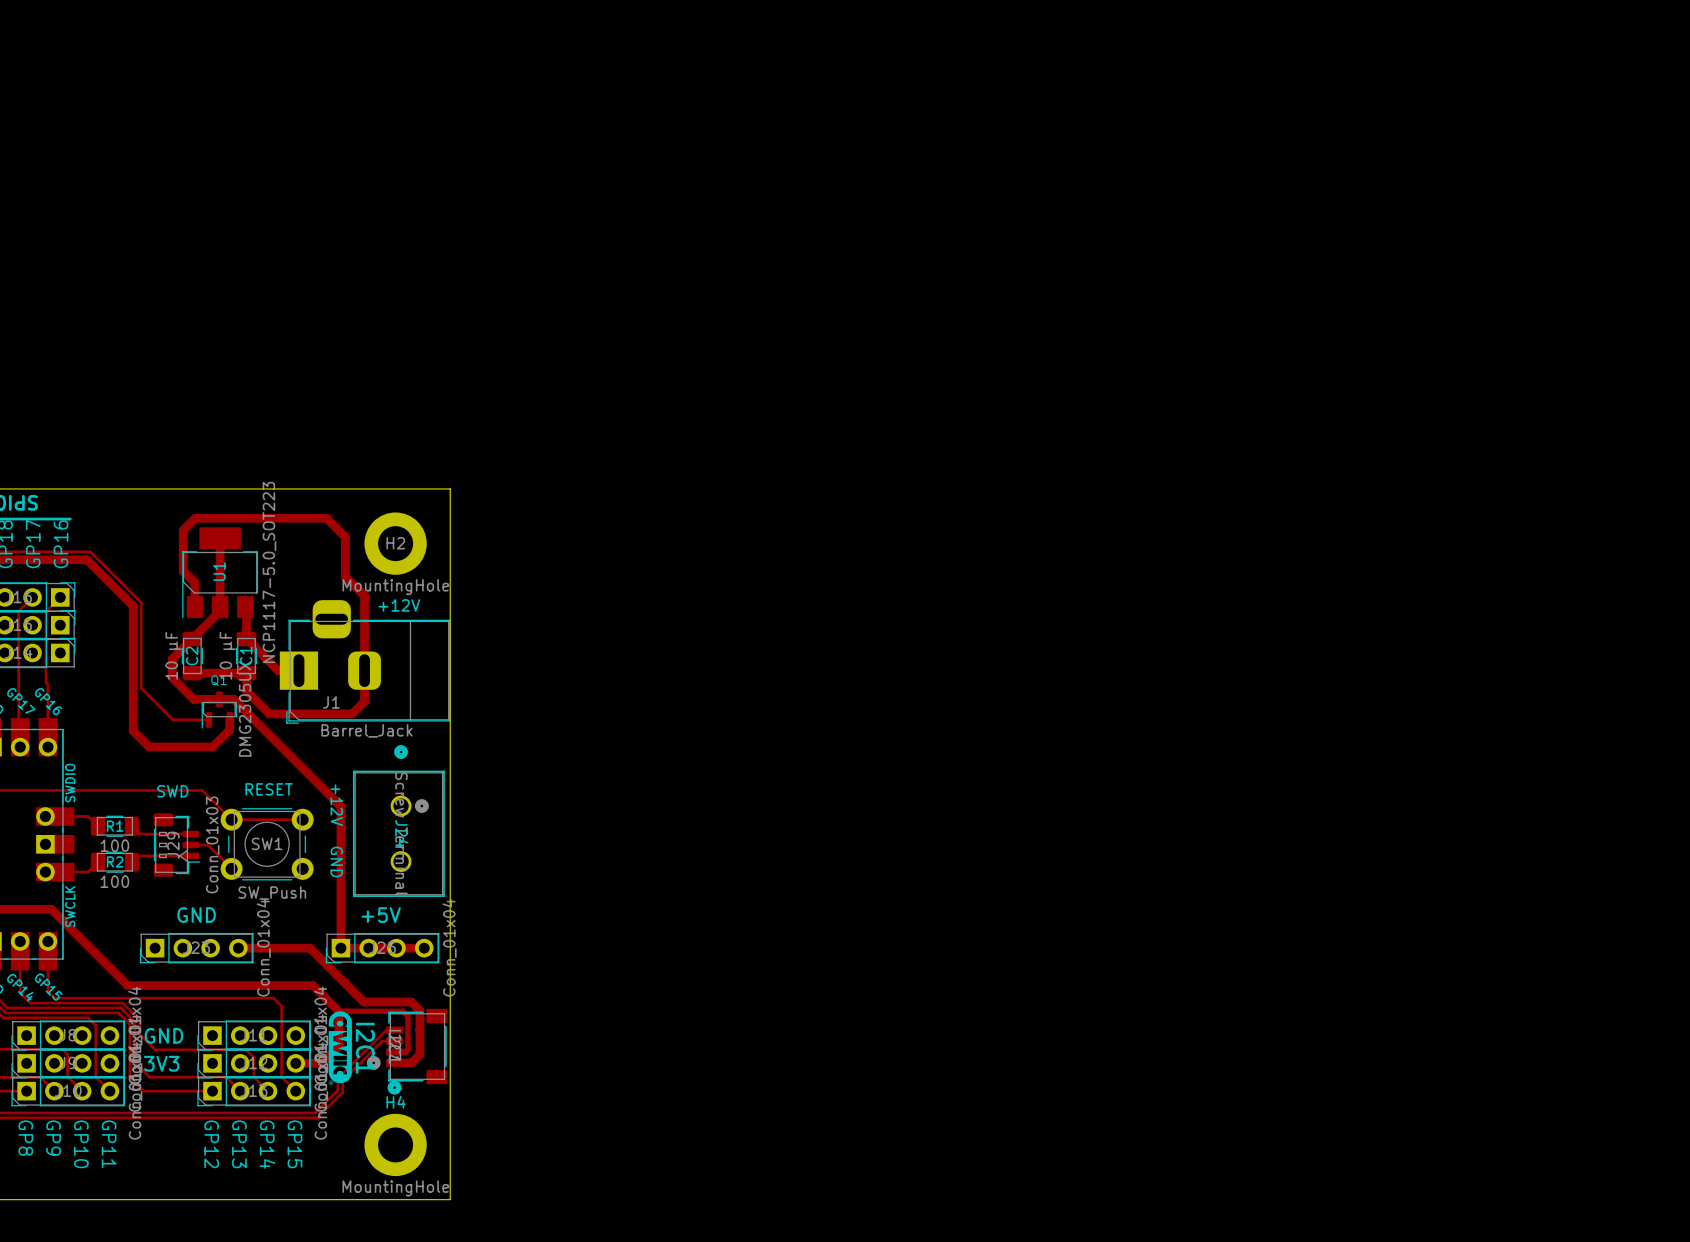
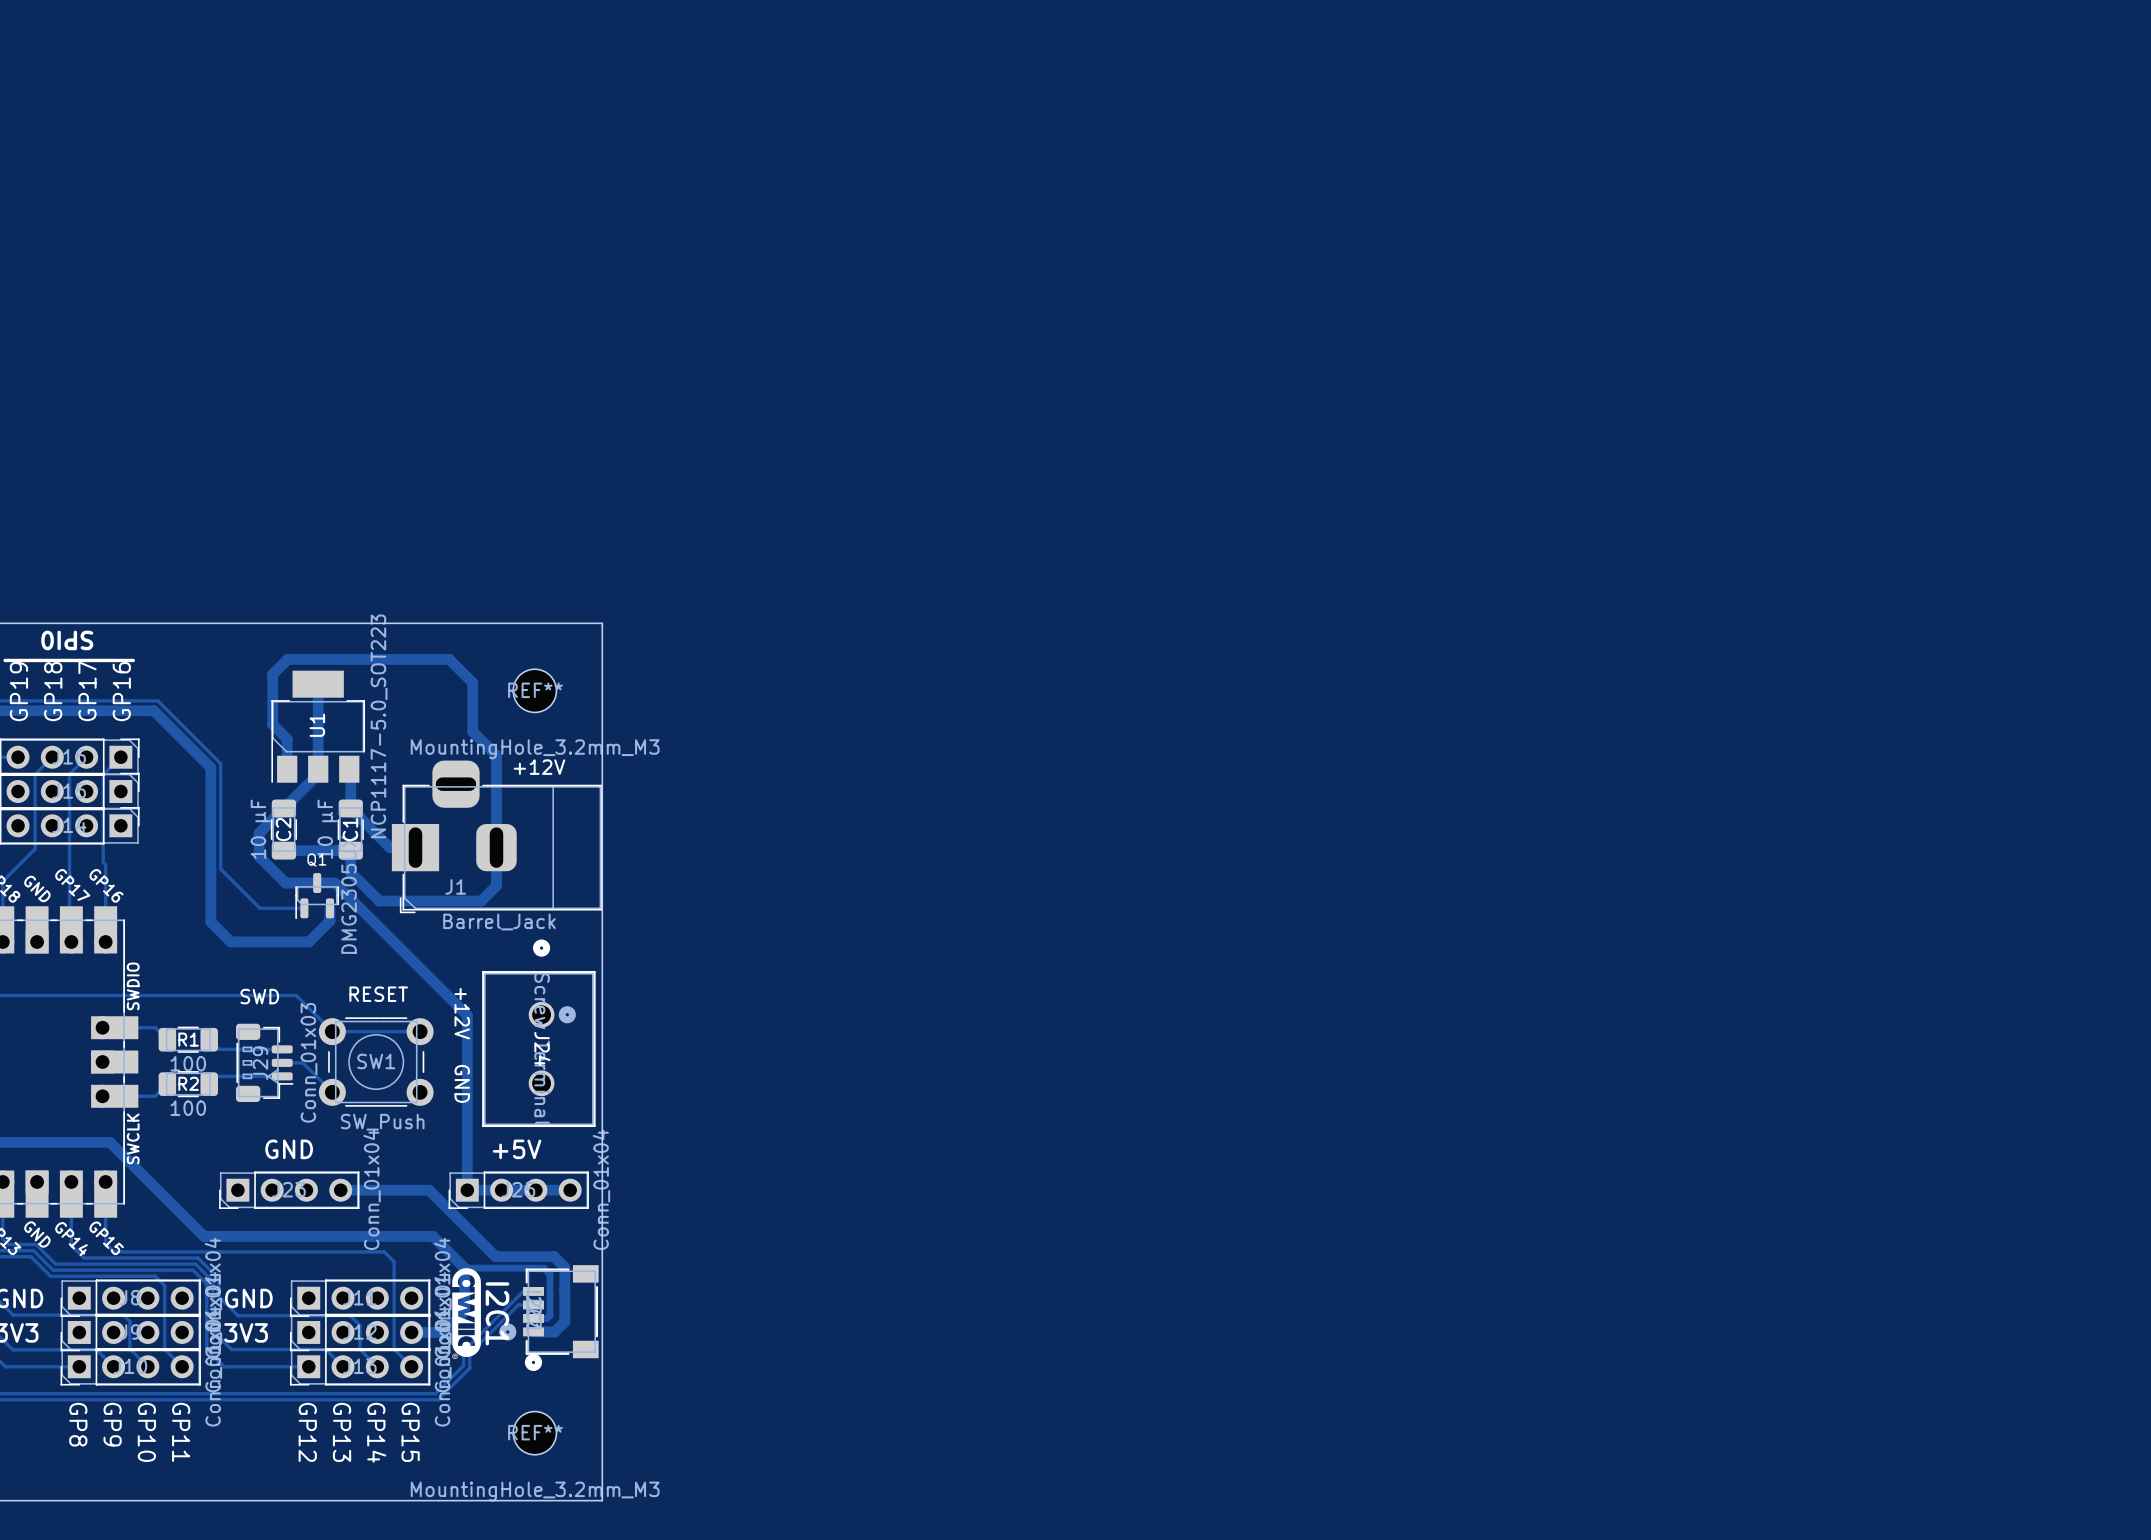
H2: MountingHole (395, 543) -> none
REF**: none -> MountingHole_3.2mm_M3 (534, 690)
H4: MountingHole (395, 1144) -> none
REF**: none -> MountingHole_3.2mm_M3 (534, 1433)

